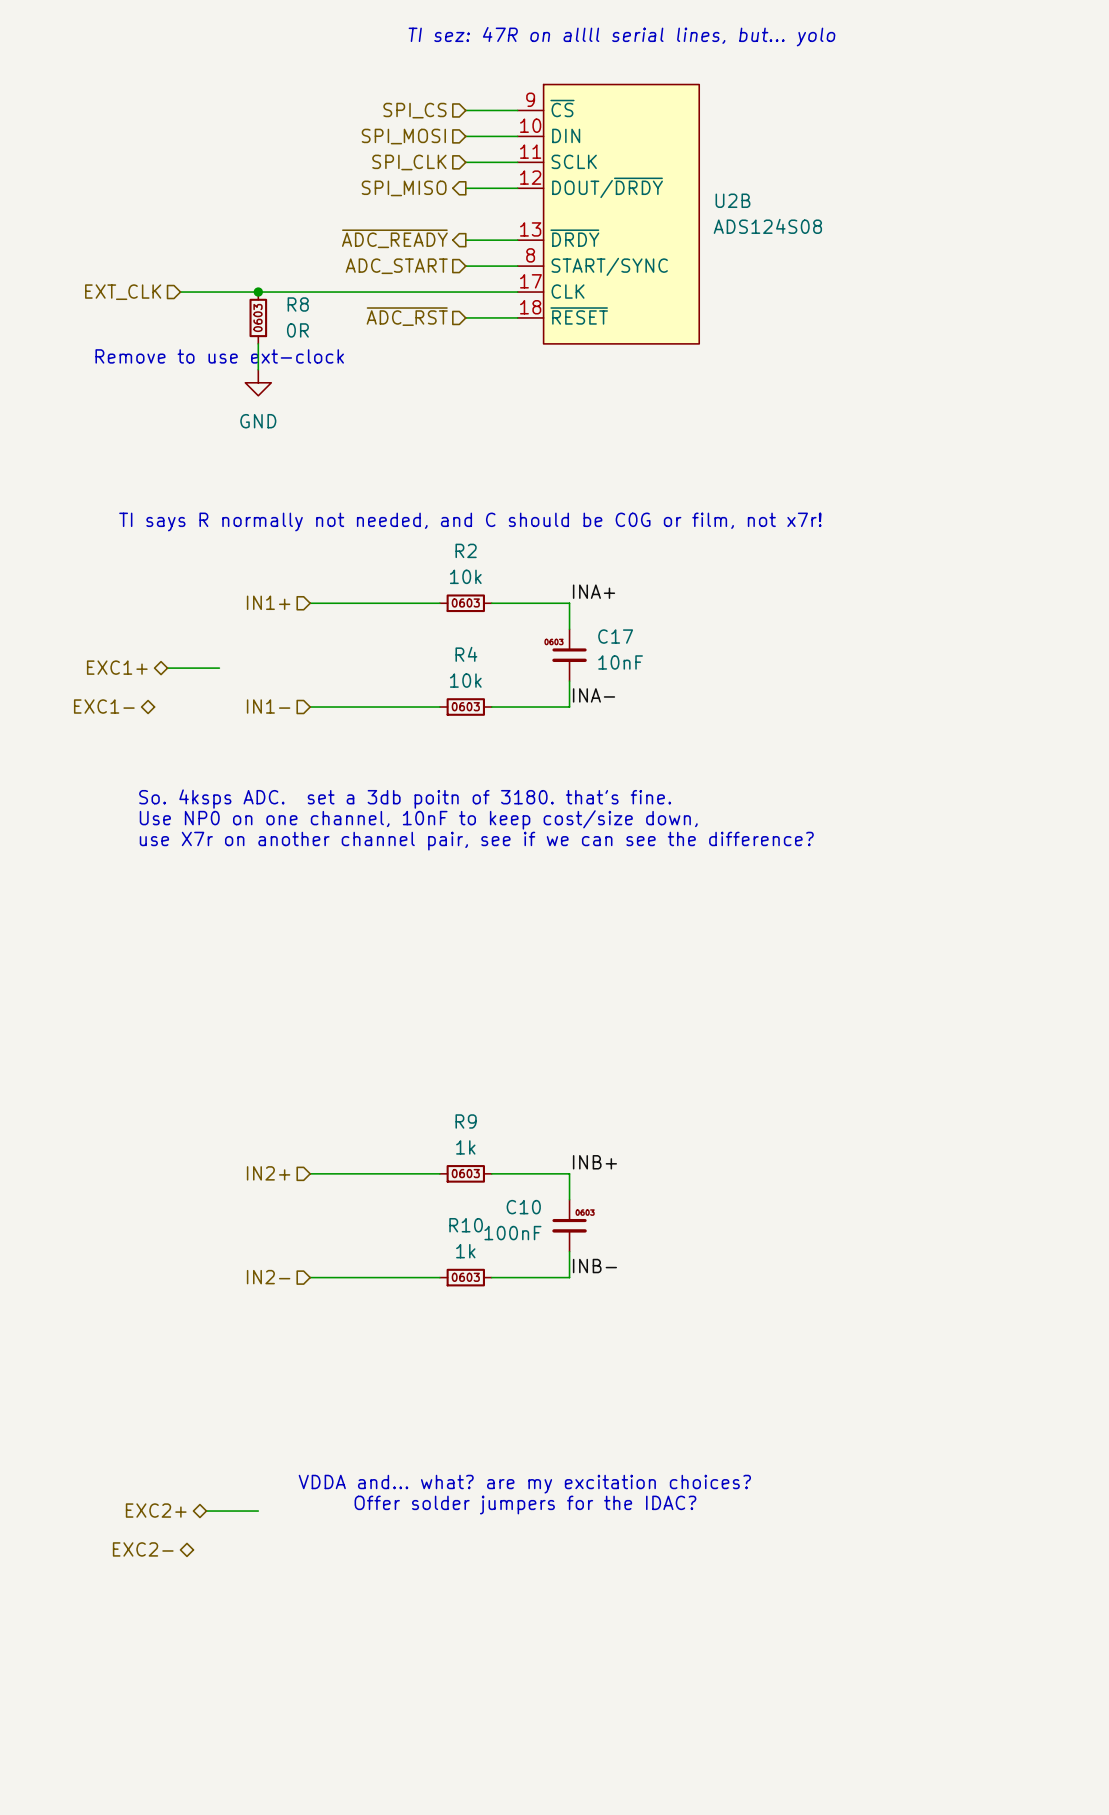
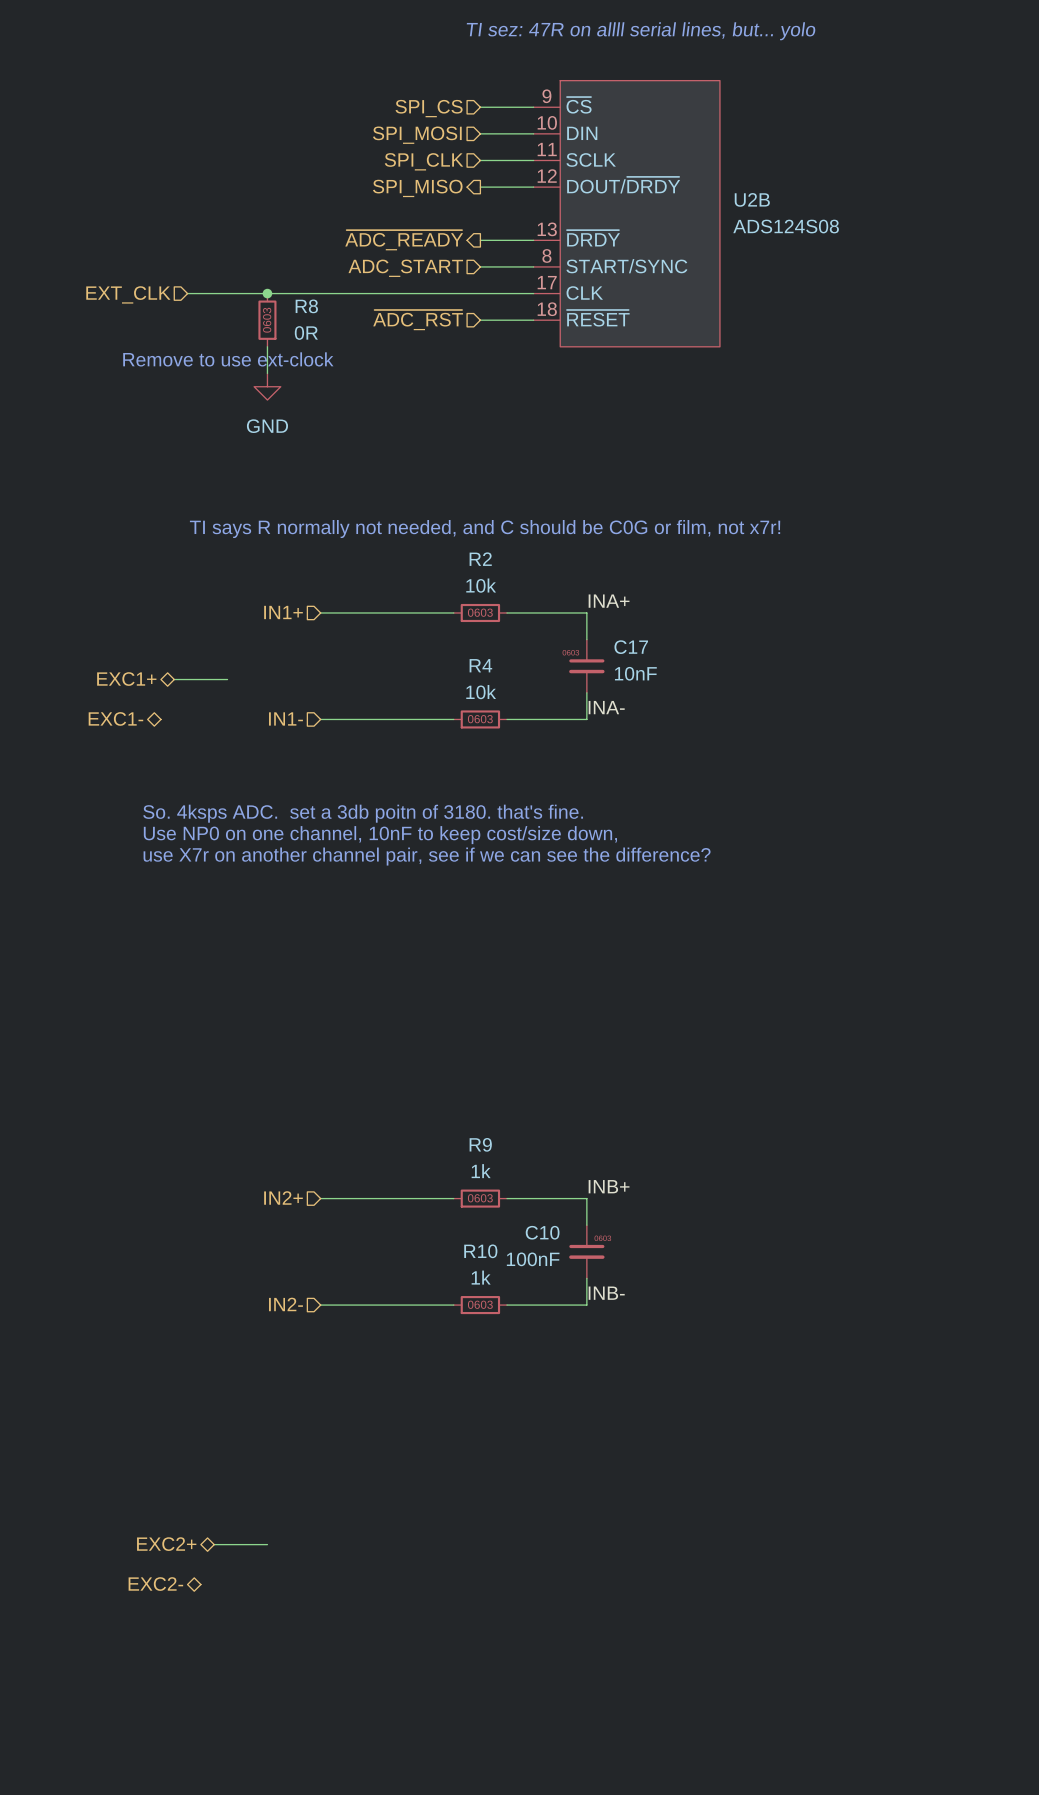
text: VDDA and... what? are my excitation choices? (524, 1484) -> none
text: Offer solder jumpers for the IDAC? (525, 1505) -> none

